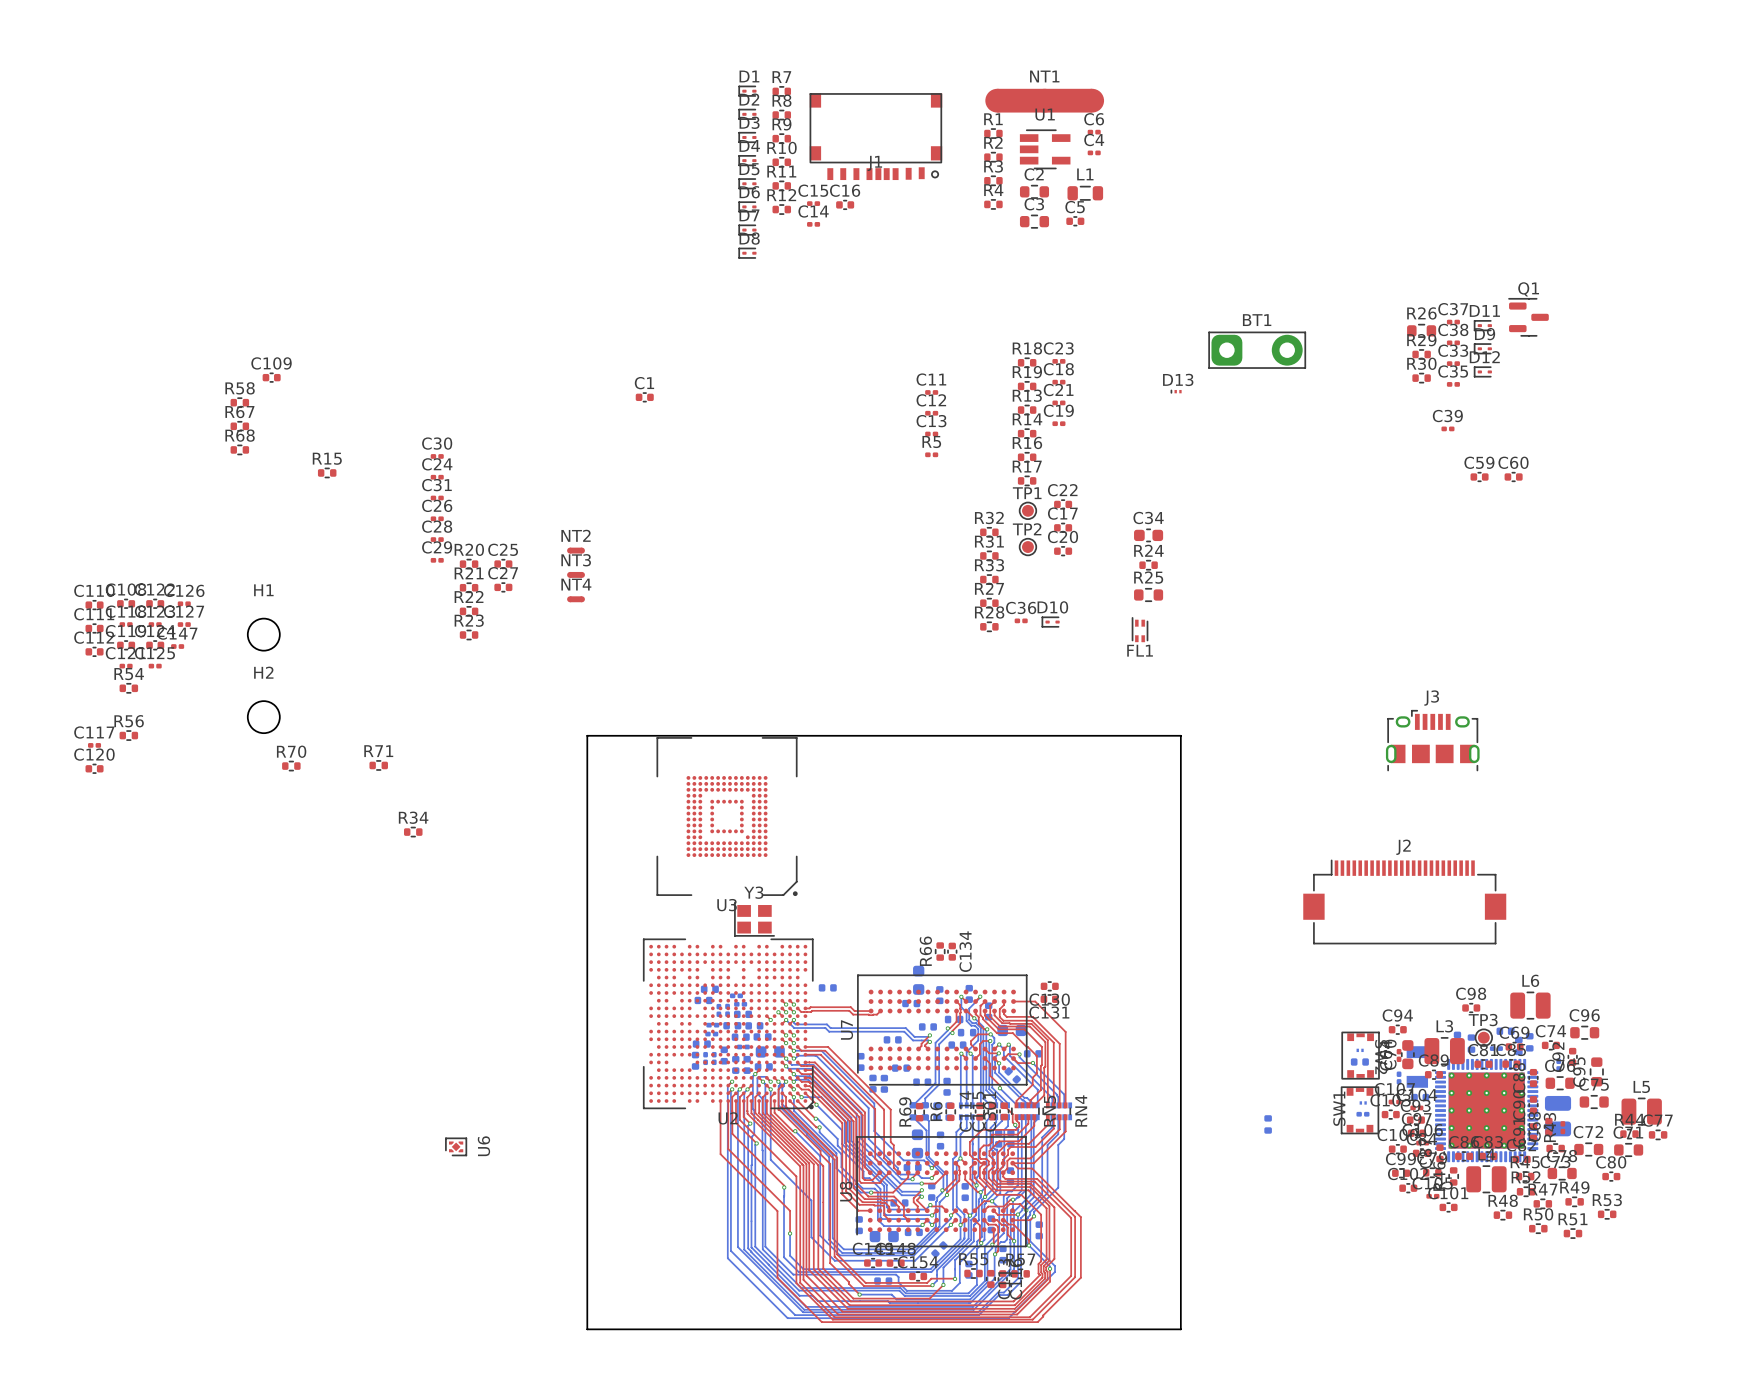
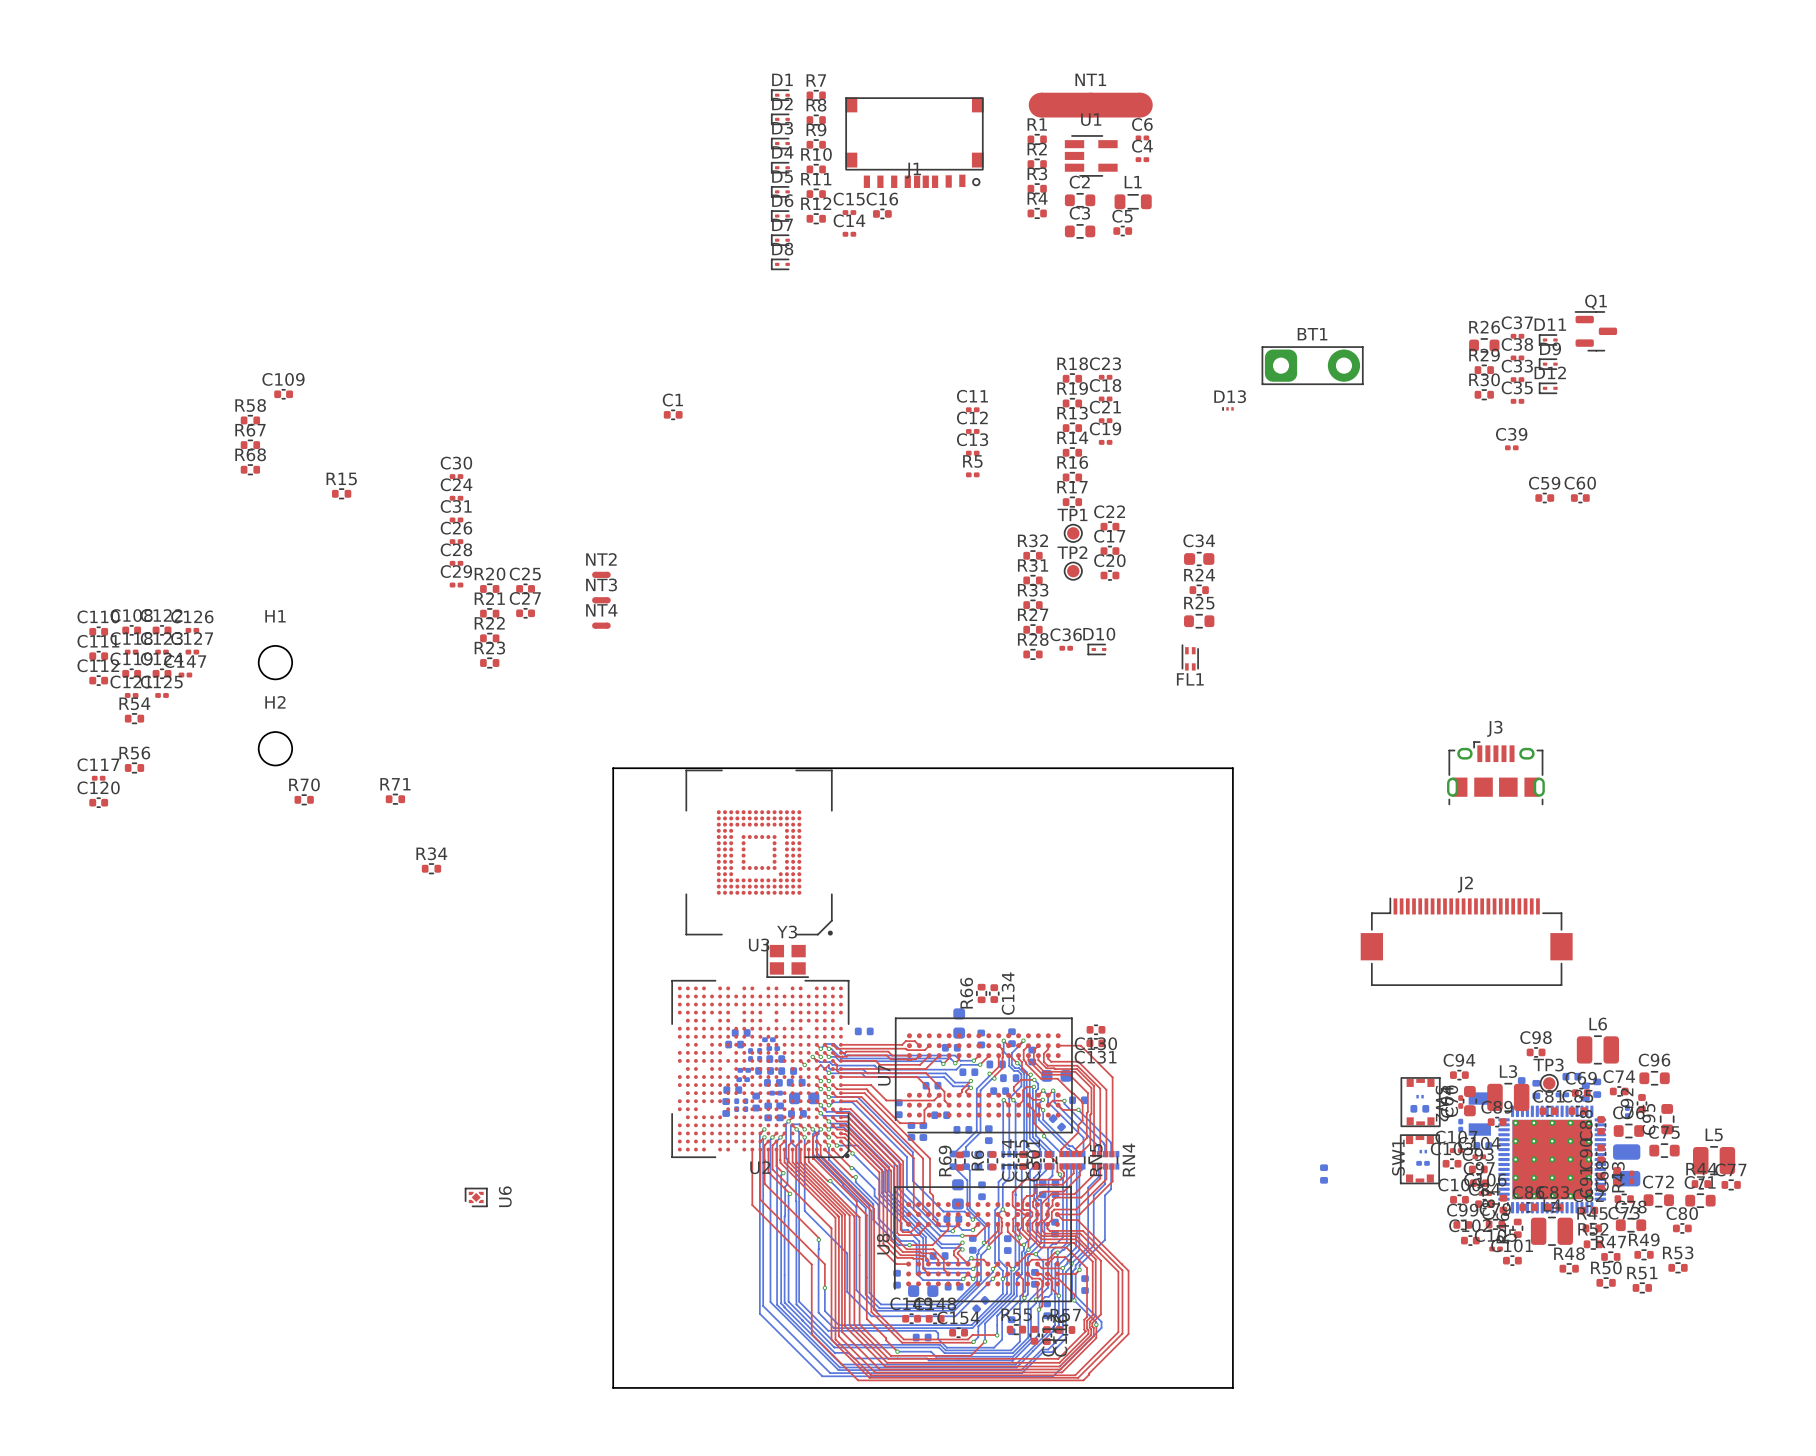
top track: none -> (832, 1044) (836, 1048) (907, 1050) (924, 1050) (929, 1045)
top track: none -> (840, 1044) (902, 1044) (905, 1041) (914, 1041) (919, 1045)
bottom track: none -> (820, 1048) (825, 1044) (834, 1044) (845, 1055) (955, 1055) (960, 1060) (973, 1060)
bottom track: none -> (828, 1048) (831, 1048) (841, 1058) (950, 1058) (955, 1063)
top track: none -> (929, 1055) (920, 1064) (879, 1064) (875, 1060) (840, 1060)
top track: none -> (939, 1055) (925, 1068) (840, 1068)
top track: none -> (949, 1055) (943, 1063)
top track: none -> (959, 1055) (959, 1059) (955, 1063)
top track: none -> (978, 1055) (973, 1060)
top track: none -> (988, 1055) (980, 1064)
bottom track: none -> (812, 1056) (816, 1060) (829, 1062) (832, 1064) (874, 1065) (878, 1069) (956, 1069) (961, 1064) (980, 1064)
bottom track: none -> (828, 1056) (835, 1056) (839, 1061) (940, 1061) (943, 1063)
via: none -> (973, 1060)
top track: none -> (832, 1060) (837, 1065) (837, 1070) (839, 1073) (925, 1073) (944, 1091) (944, 1100) (949, 1105)
via: none -> (955, 1063)
via: (786, 1019) -> none
via: (793, 1019) -> none
via: none -> (943, 1063)
via: none -> (980, 1064)
via: none -> (828, 1072)
top track: none -> (840, 1077) (917, 1077) (929, 1089) (929, 1095)
top track: none -> (832, 1085) (837, 1089) (866, 1089) (900, 1123) (923, 1123) (924, 1110) (929, 1105)
top track: none -> (840, 1085) (871, 1085) (886, 1100) (934, 1100) (939, 1095)

